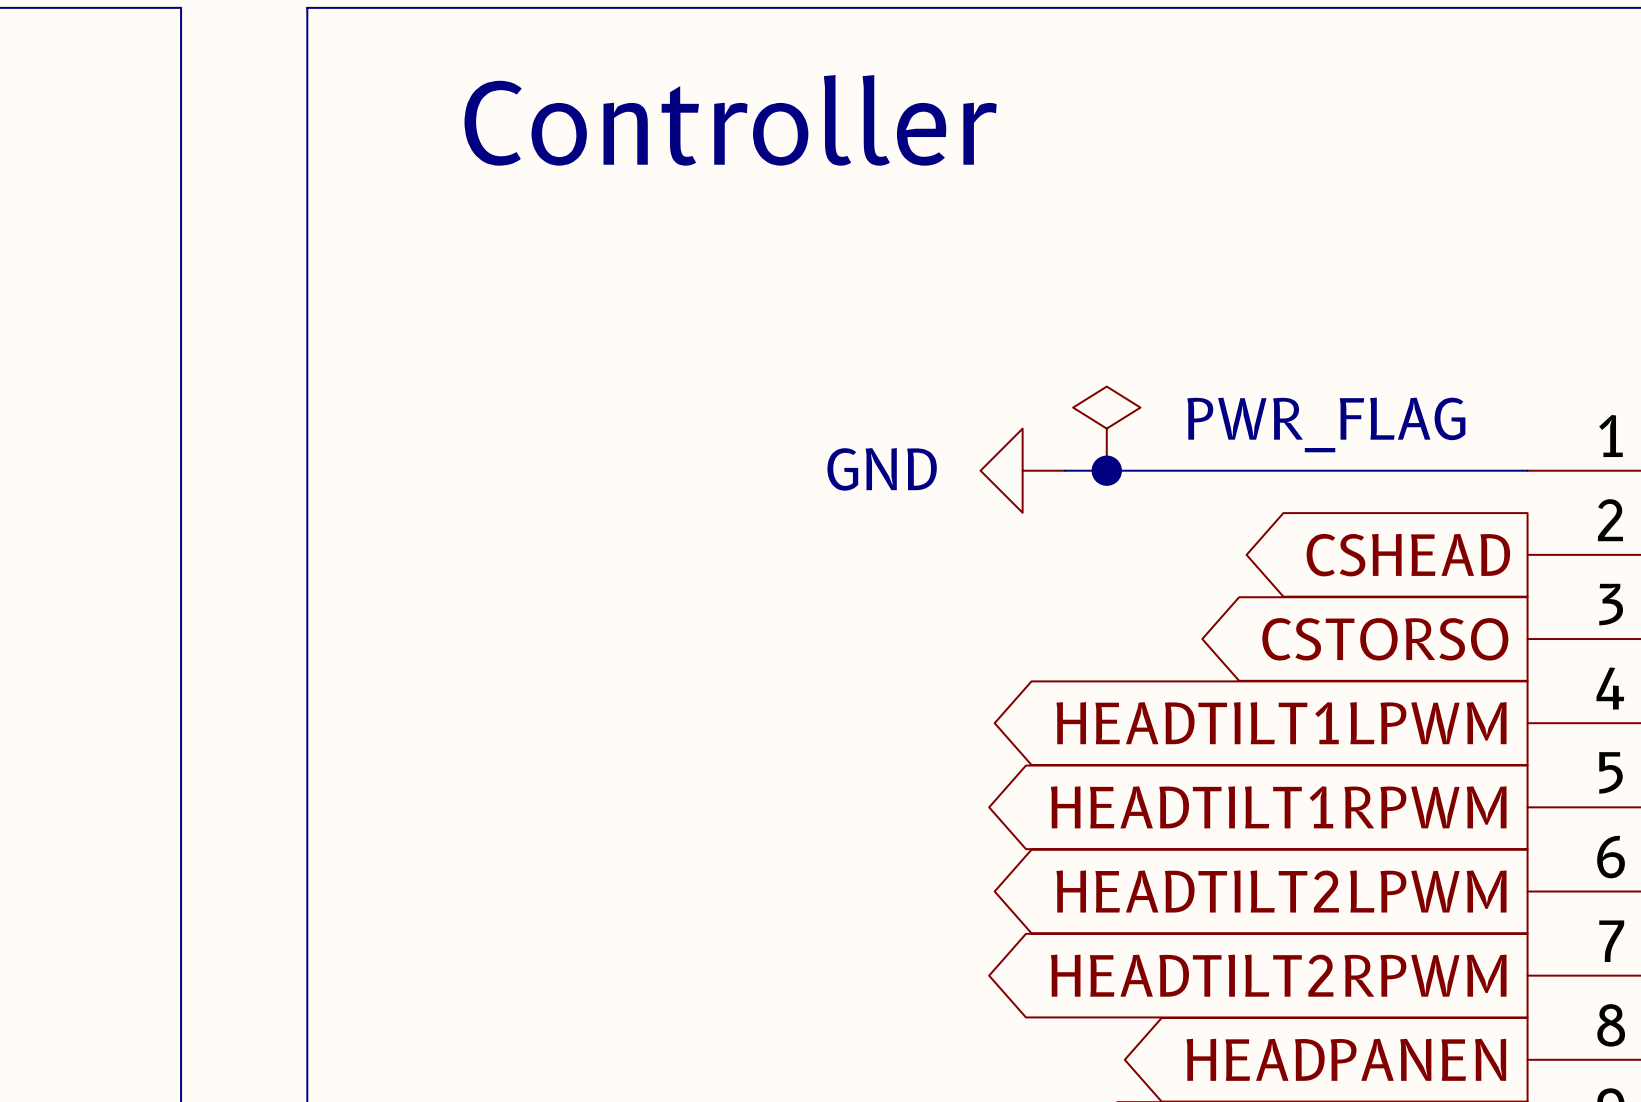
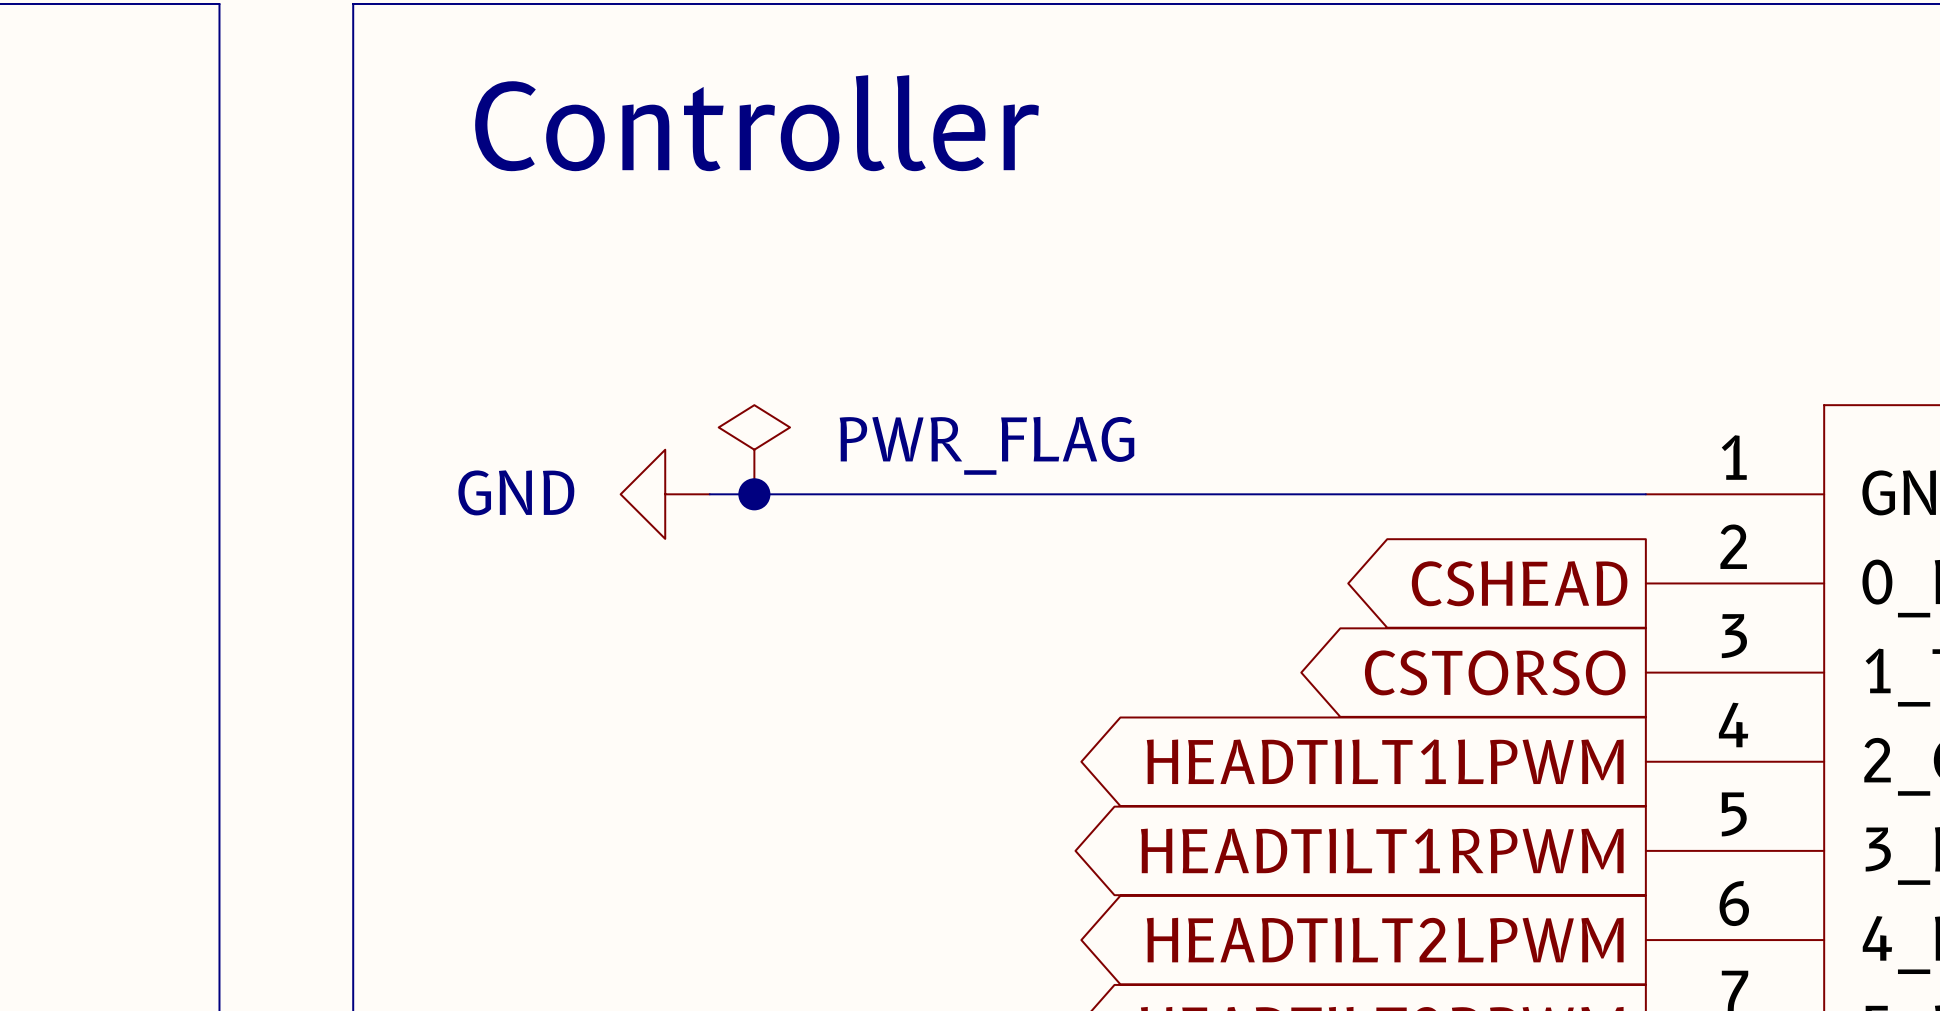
text position: Controller (730, 120) -> Controller (756, 123)
power symbol position: PWR_FLAG (1106, 428) -> PWR_FLAG (754, 449)
wire: none -> (709, 494) (1155, 494)
junction: none -> (754, 494)
power symbol position: GND (1022, 470) -> GND (665, 494)
junction: (1106, 470) -> none

